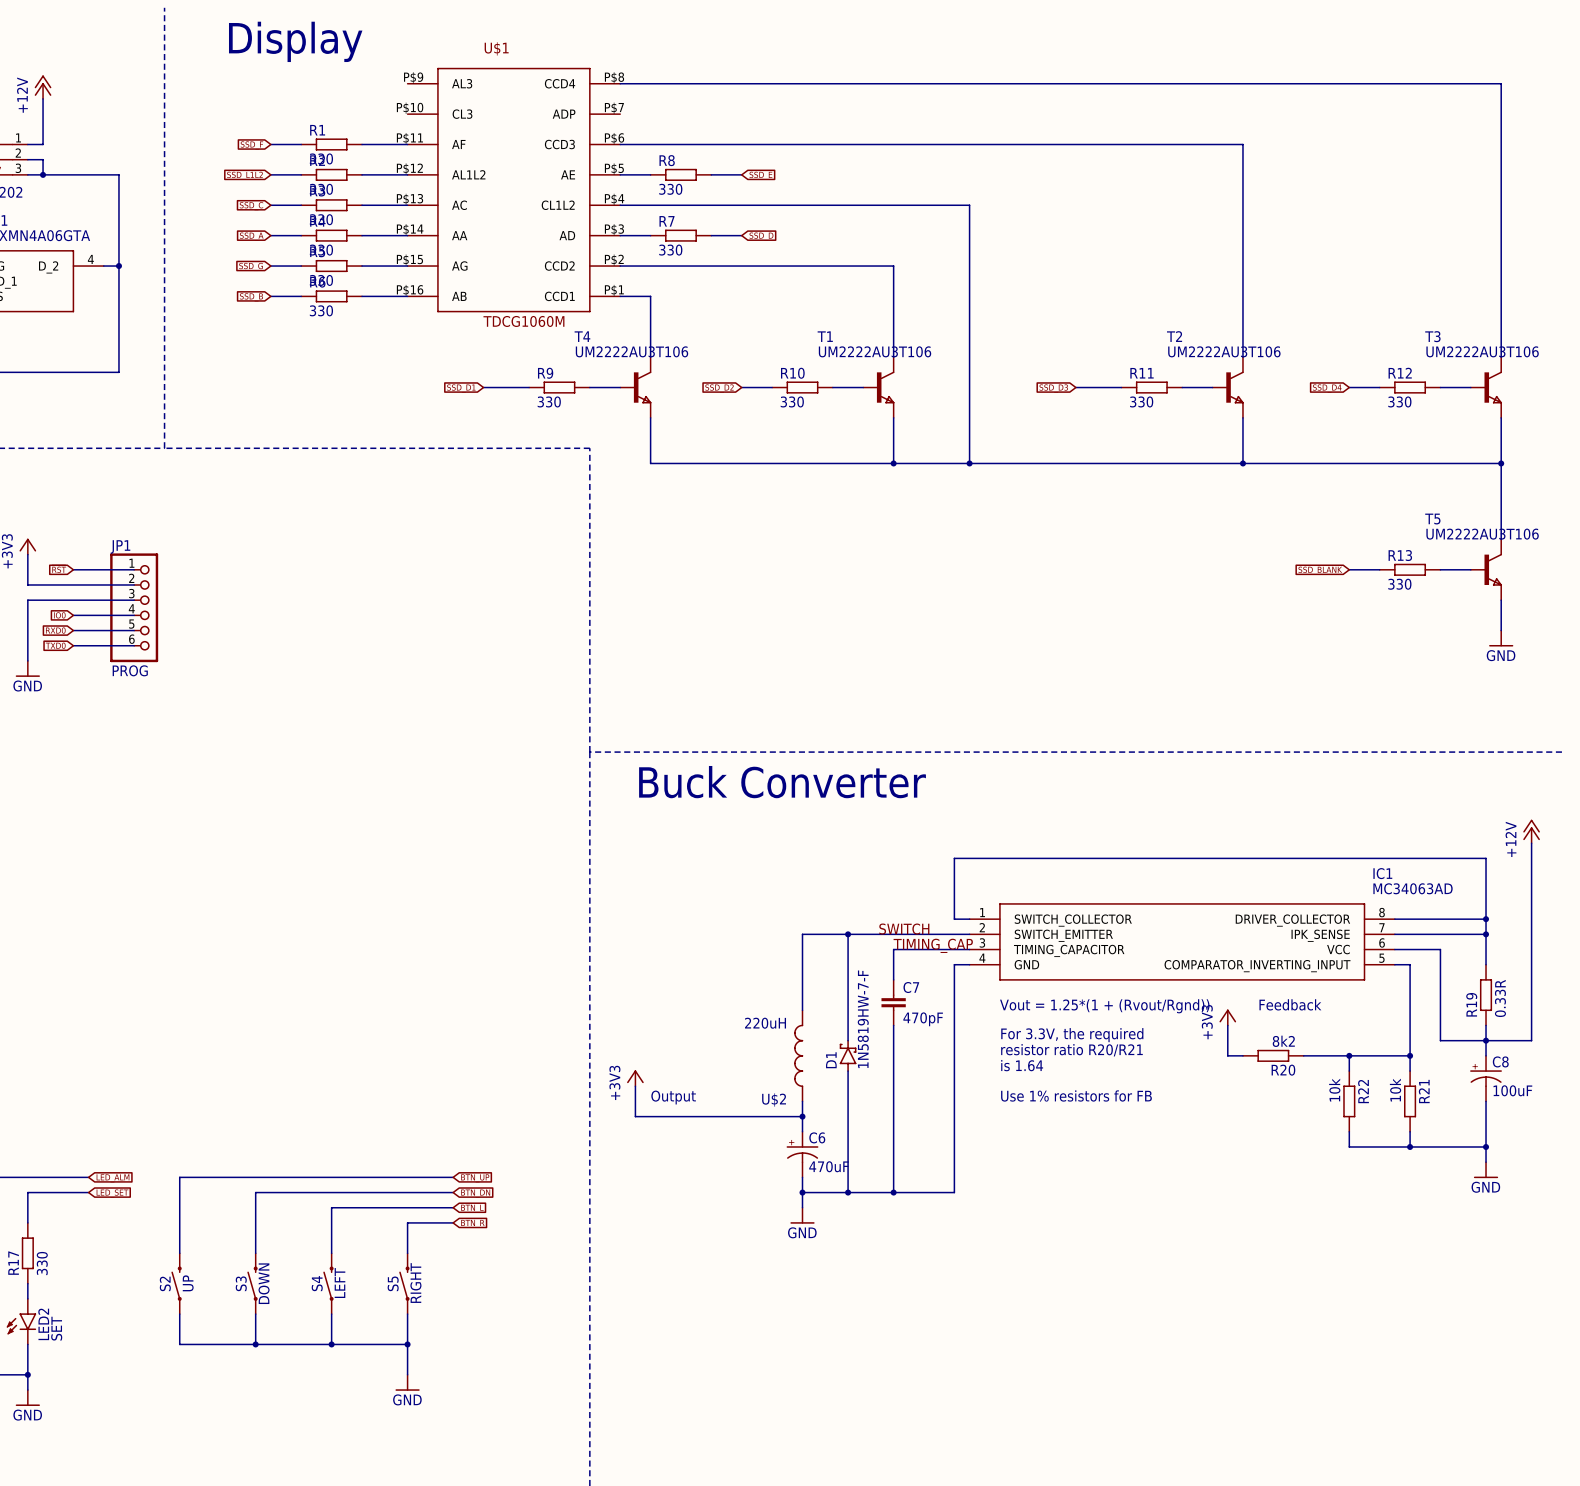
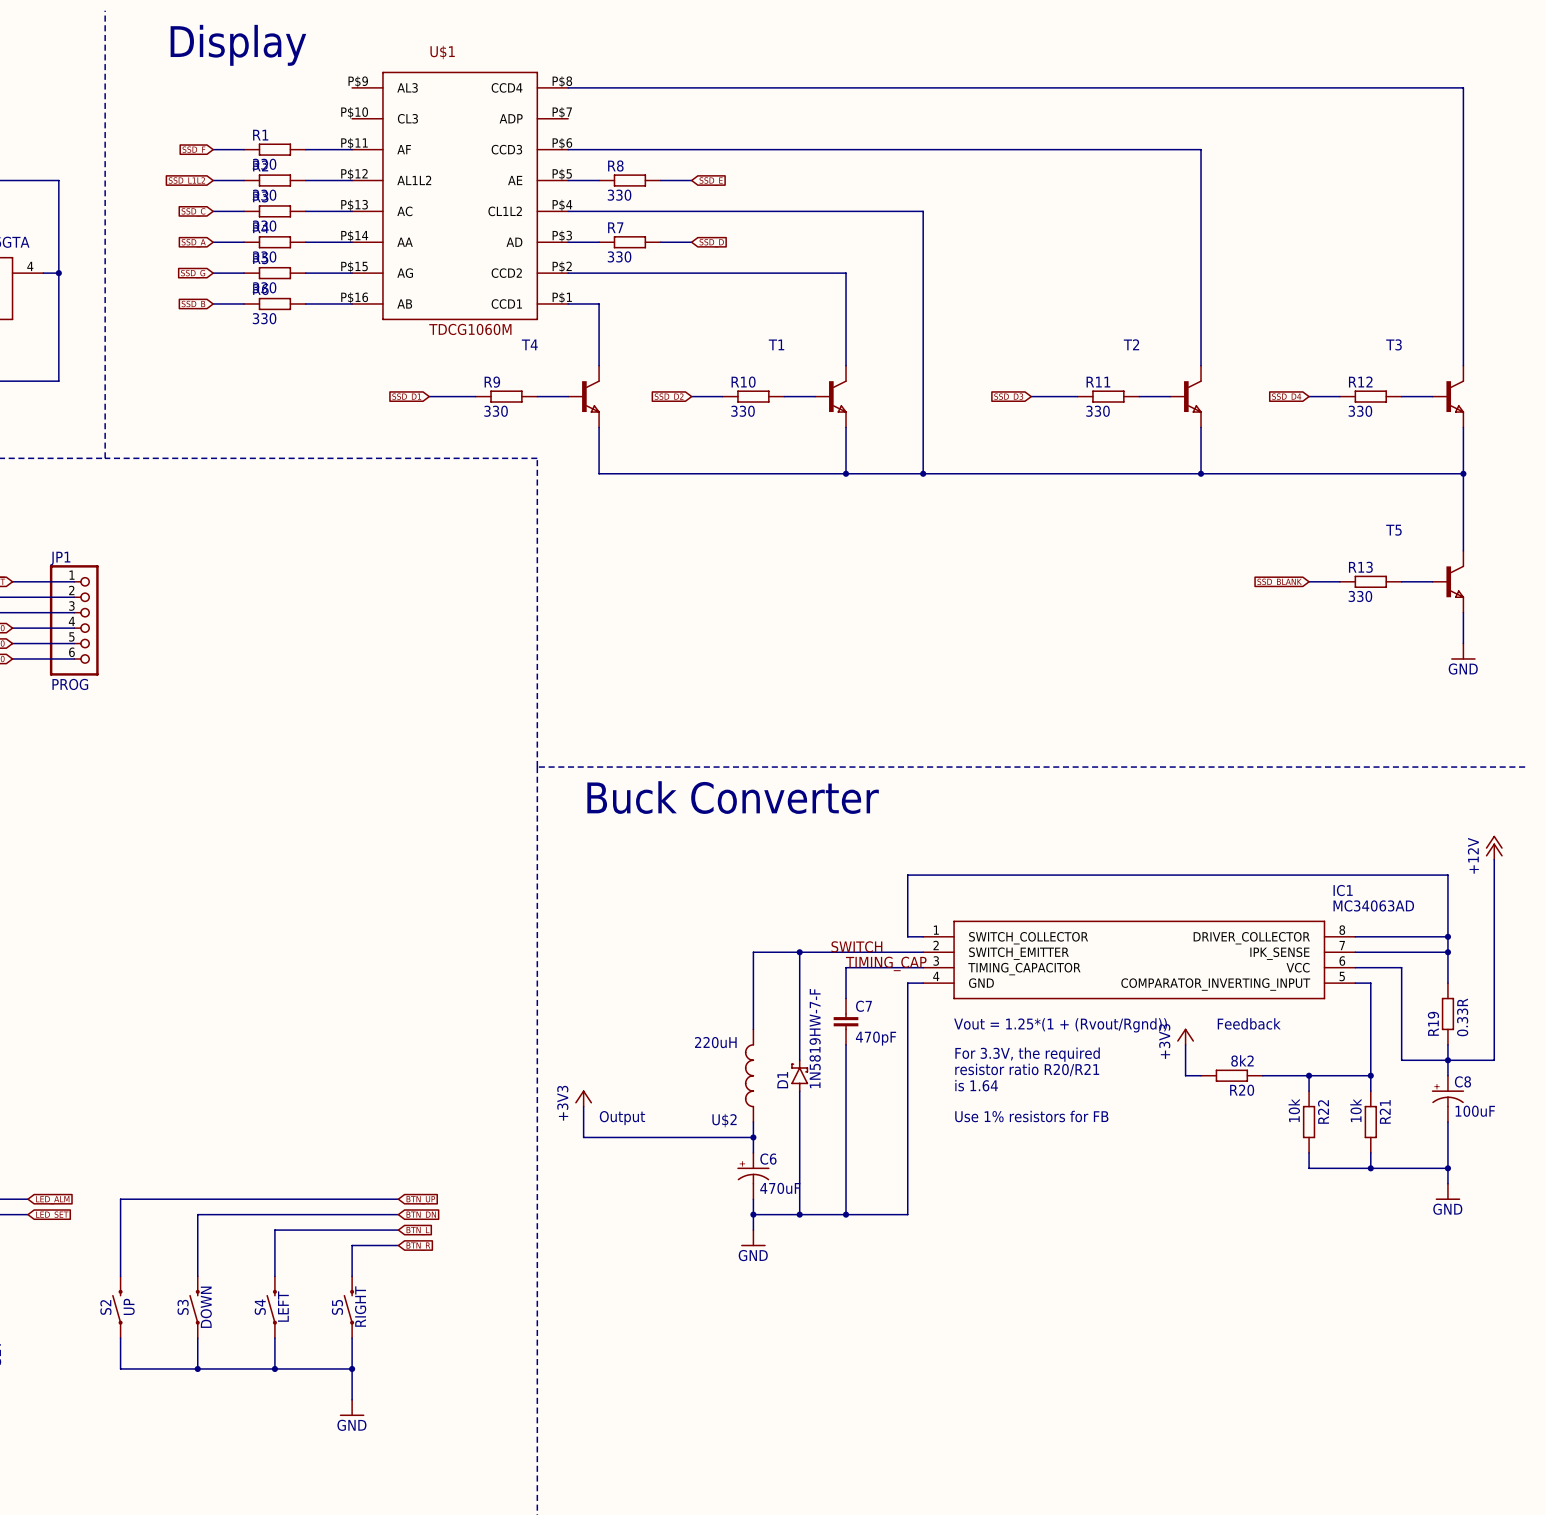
T4 value: UM2222AU3T106 (631, 351) -> none
T1 value: UM2222AU3T106 (875, 351) -> none
T2 value: UM2222AU3T106 (1224, 351) -> none
T3 value: UM2222AU3T106 (1482, 351) -> none
T5 value: UM2222AU3T106 (1482, 534) -> none

